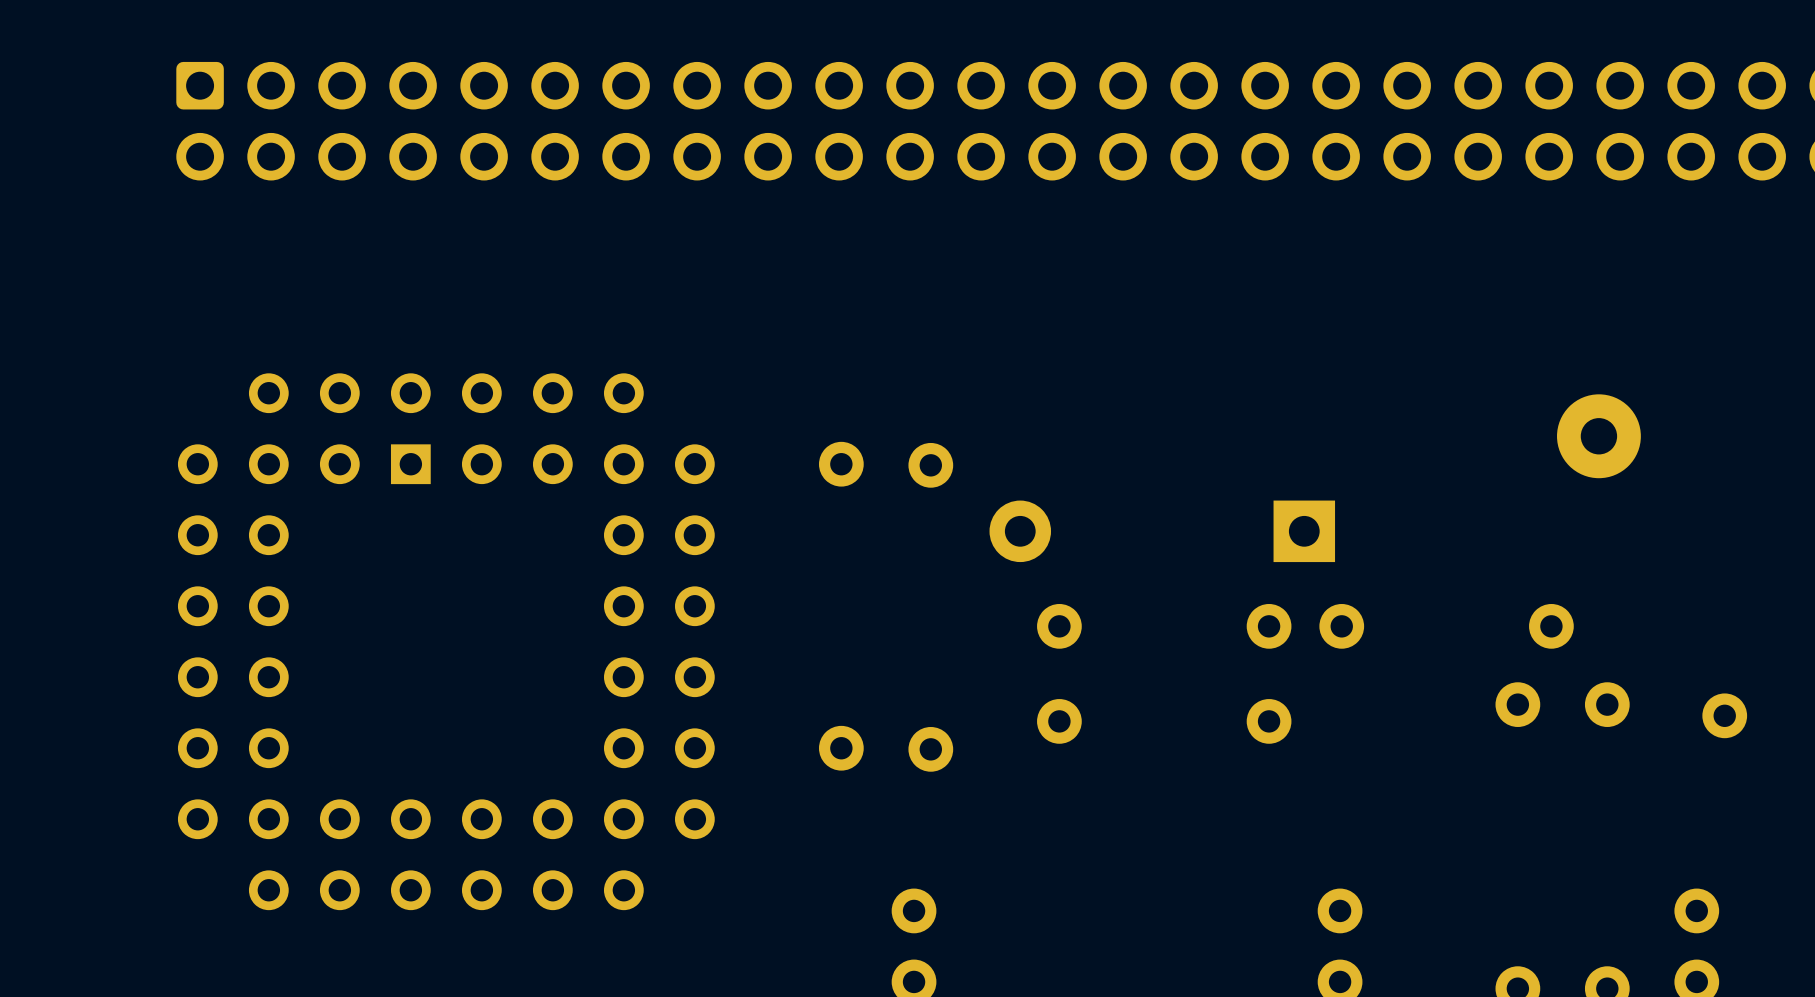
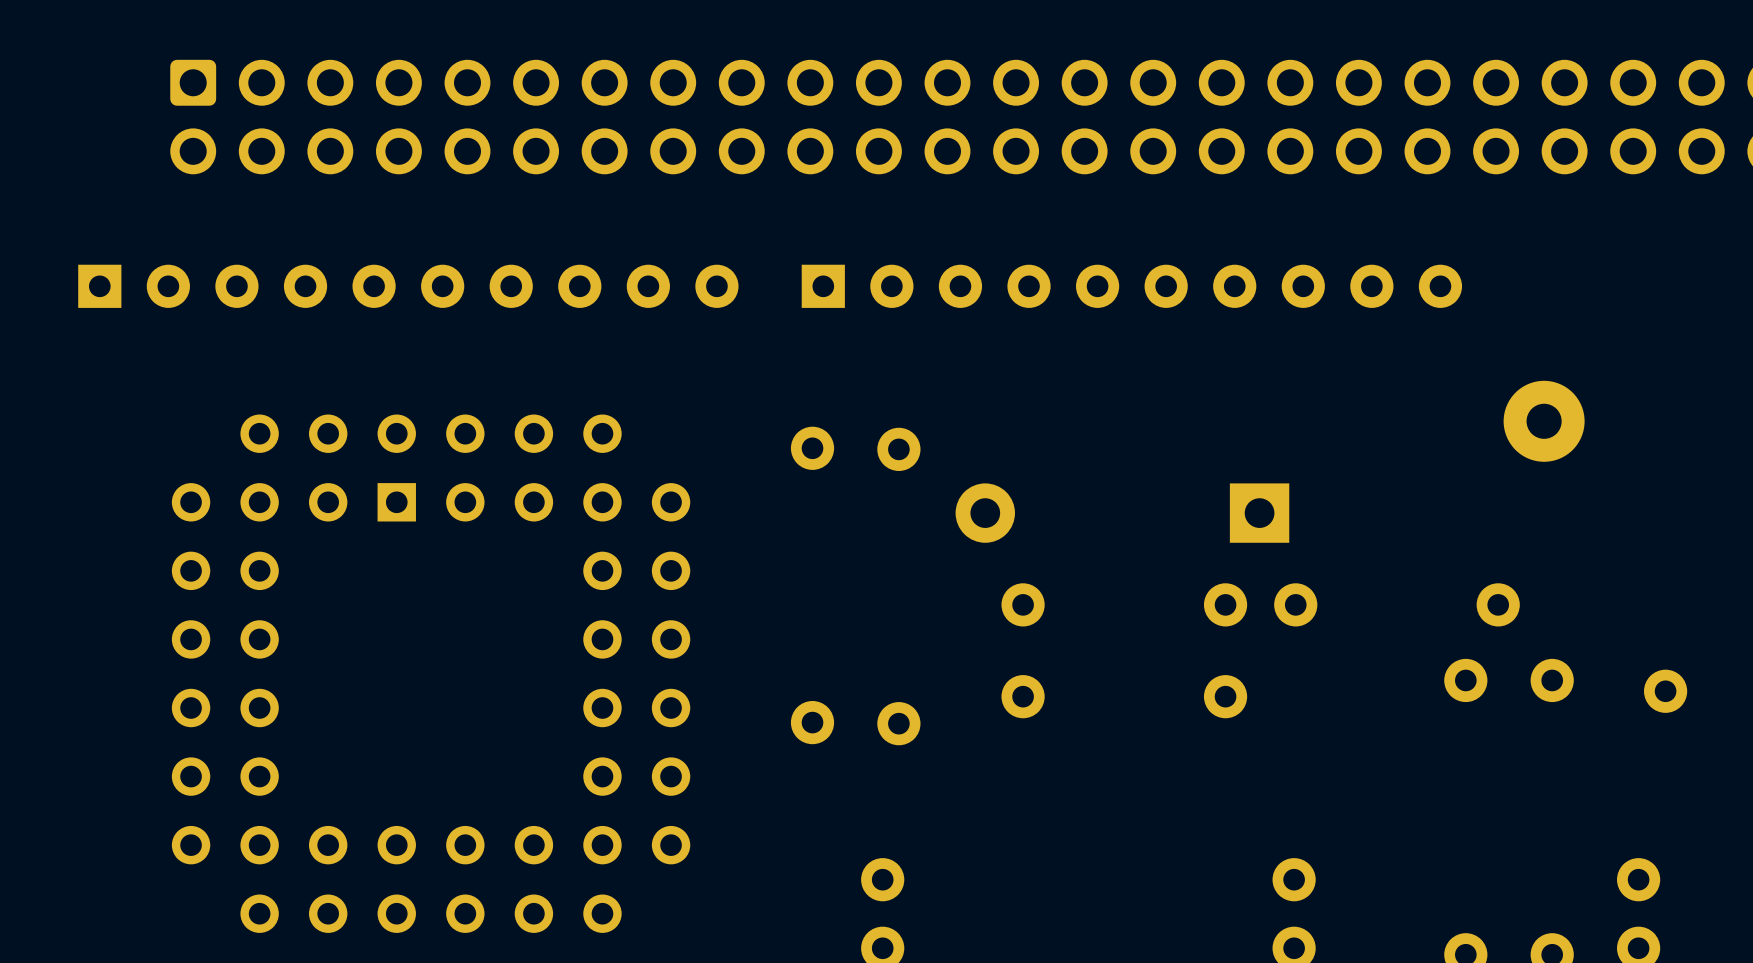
part: none -> (408, 286)
part: none -> (1131, 286)
part position: (446, 641) -> (431, 673)

